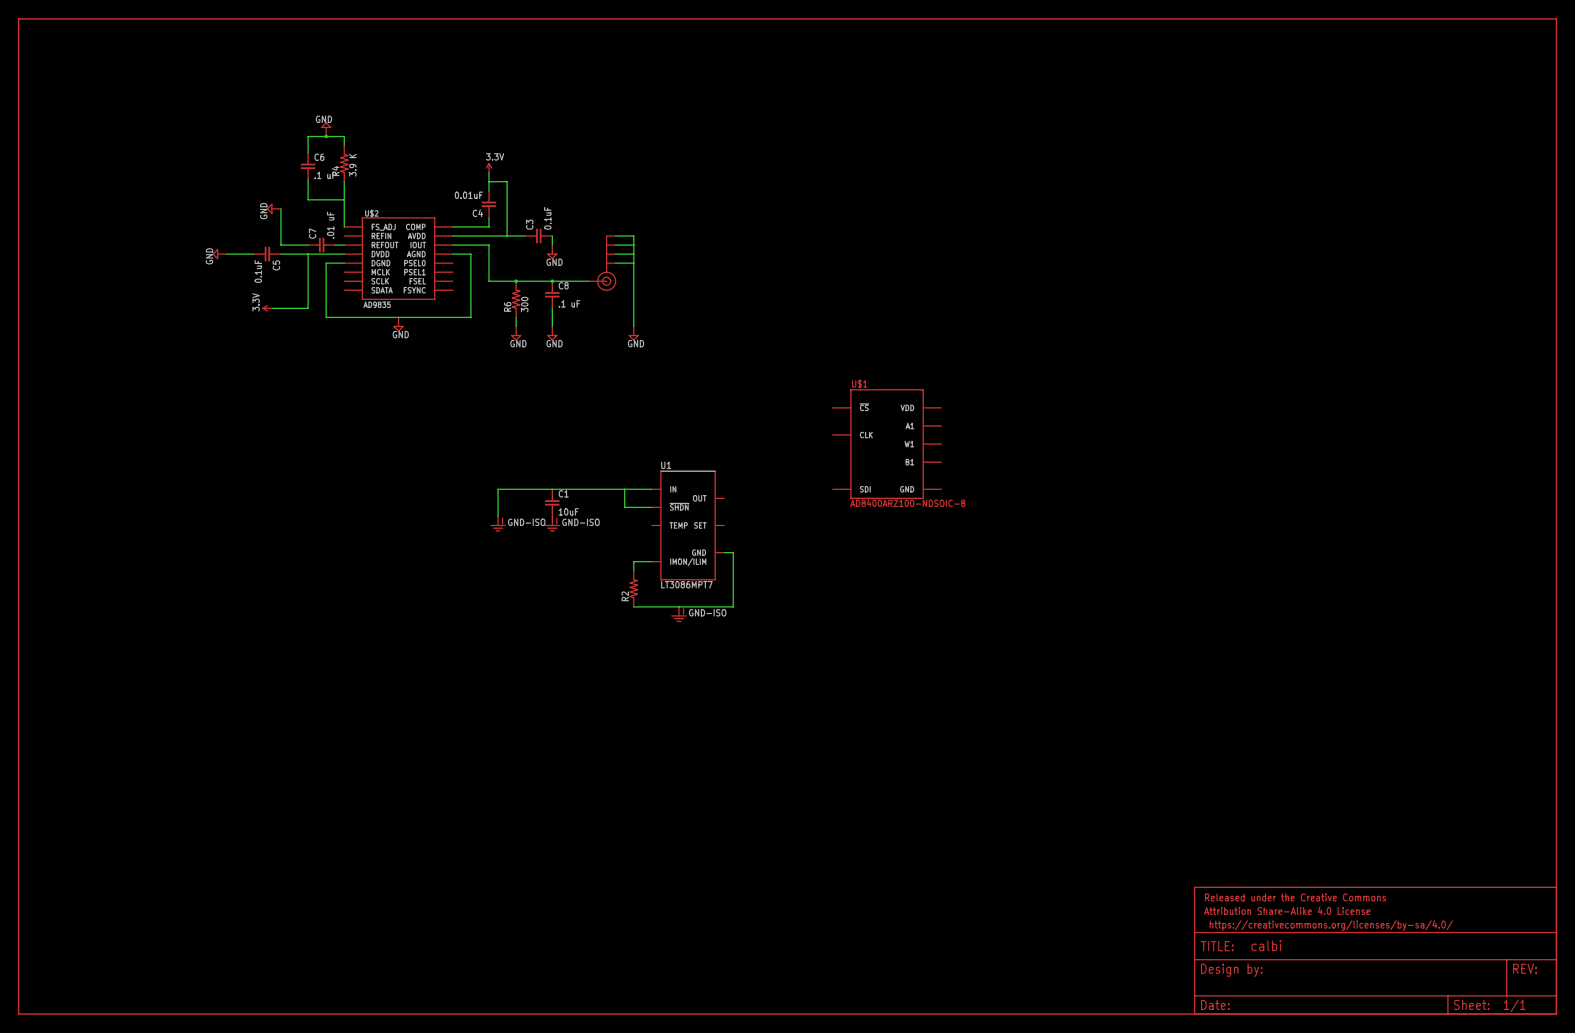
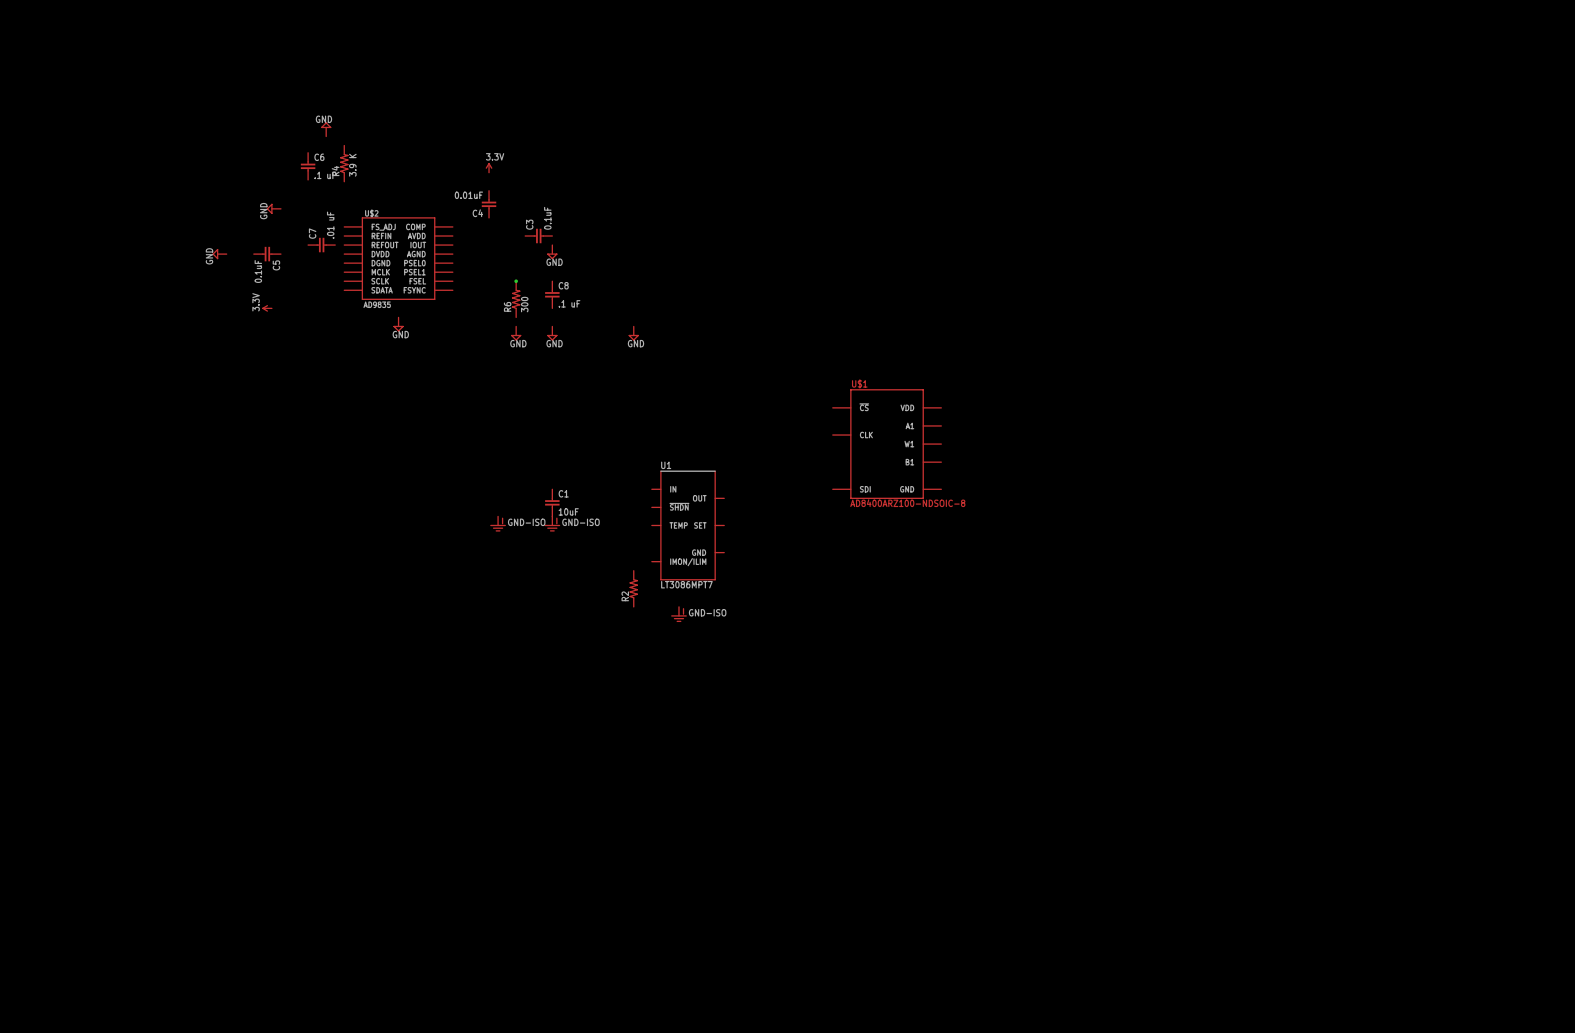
junction: (326, 136) -> none
wire: (344, 145) (344, 136) (308, 136) (308, 152) -> none
wire: (489, 172) (489, 190) -> none
wire: (308, 179) (308, 199) (344, 199) -> none
wire: (344, 181) (344, 226) -> none
wire: (489, 181) (507, 181) (507, 236) -> none
wire: (280, 208) (280, 245) (308, 245) -> none
wire: (489, 217) (489, 226) (452, 226) -> none
wire: (452, 236) (525, 236) -> none
wire: (552, 236) (552, 245) -> none
wire: (615, 236) (633, 236) (633, 326) -> none
wire: (335, 245) (344, 245) -> none
wire: (452, 245) (489, 245) (489, 281) (588, 281) -> none
wire: (615, 245) (633, 245) -> none
wire: (226, 254) (253, 254) -> none
wire: (280, 254) (344, 254) -> none
wire: (308, 254) (308, 308) (271, 308) -> none
wire: (452, 254) (470, 254) (470, 317) (326, 317) (326, 263) (344, 263) -> none
wire: (615, 254) (633, 254) -> none
part: (602, 263) -> none
wire: (615, 263) (633, 263) -> none
junction: (552, 281) -> none
wire: (552, 308) (552, 326) -> none
wire: (516, 317) (516, 326) -> none
wire: (624, 489) (624, 507) (651, 507) -> none
wire: (651, 489) (498, 489) (498, 516) -> none
part: (787, 516) -> none
wire: (724, 552) (733, 552) (733, 606) (633, 606) -> none
wire: (651, 561) (633, 561) (633, 570) -> none
part: (1375, 950) -> none

